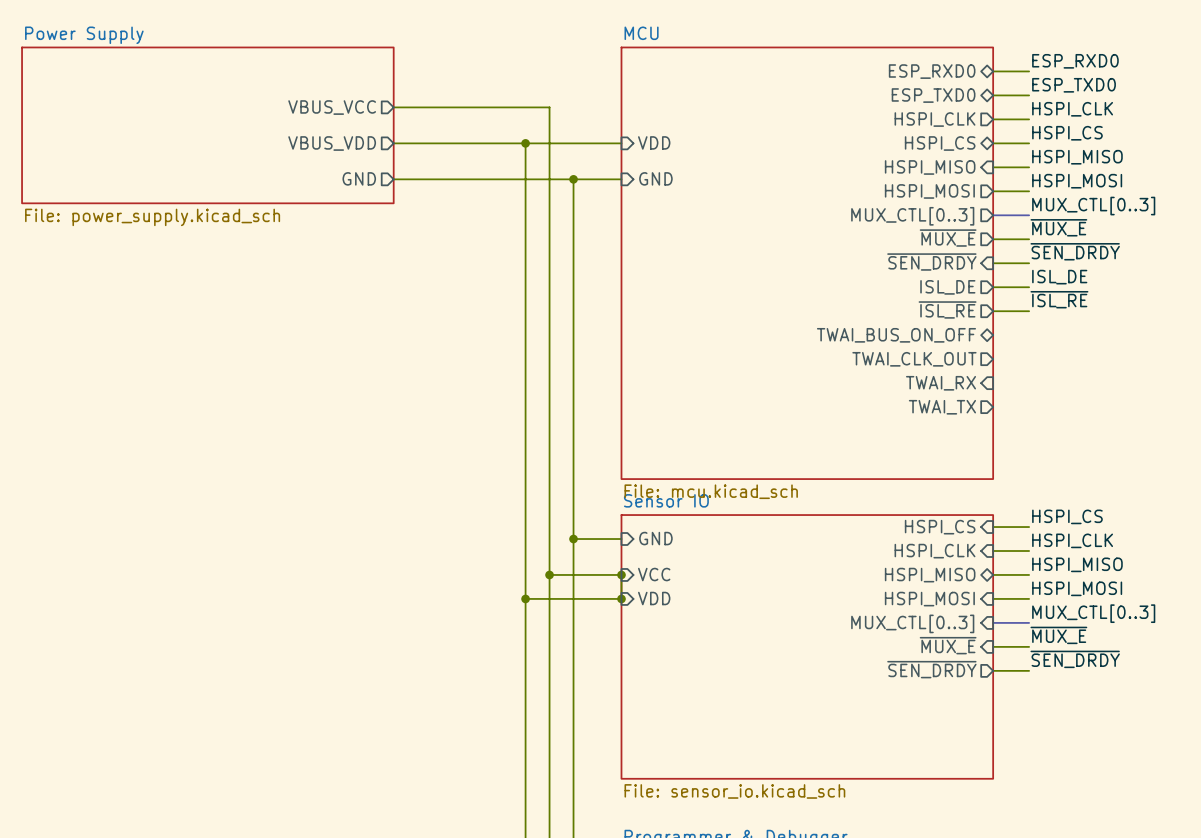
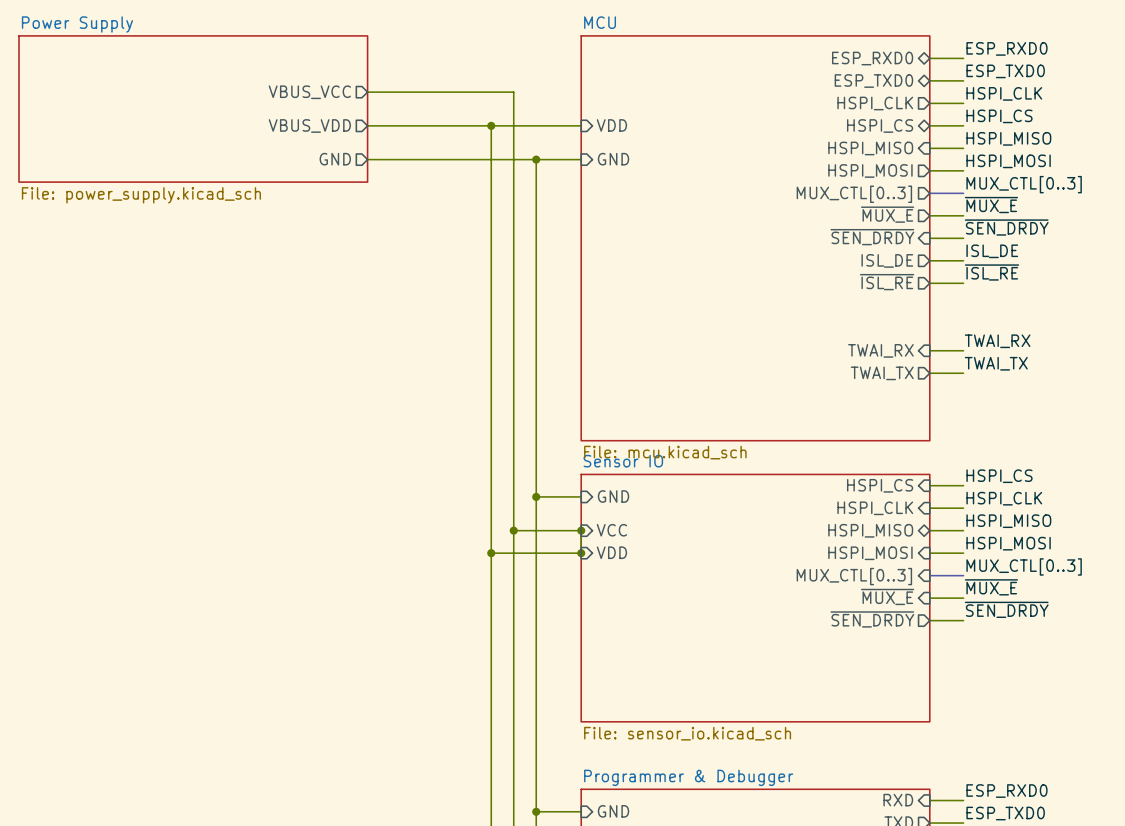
sheet pin: TWAI_BUS_ON_OFF (896, 335) -> none
sheet pin: TWAI_CLK_OUT (914, 359) -> none
label: none -> TWAI_RX (997, 341)
wire: none -> (929, 350) (963, 350)
label: none -> TWAI_TX (996, 363)
wire: none -> (929, 373) (963, 373)

